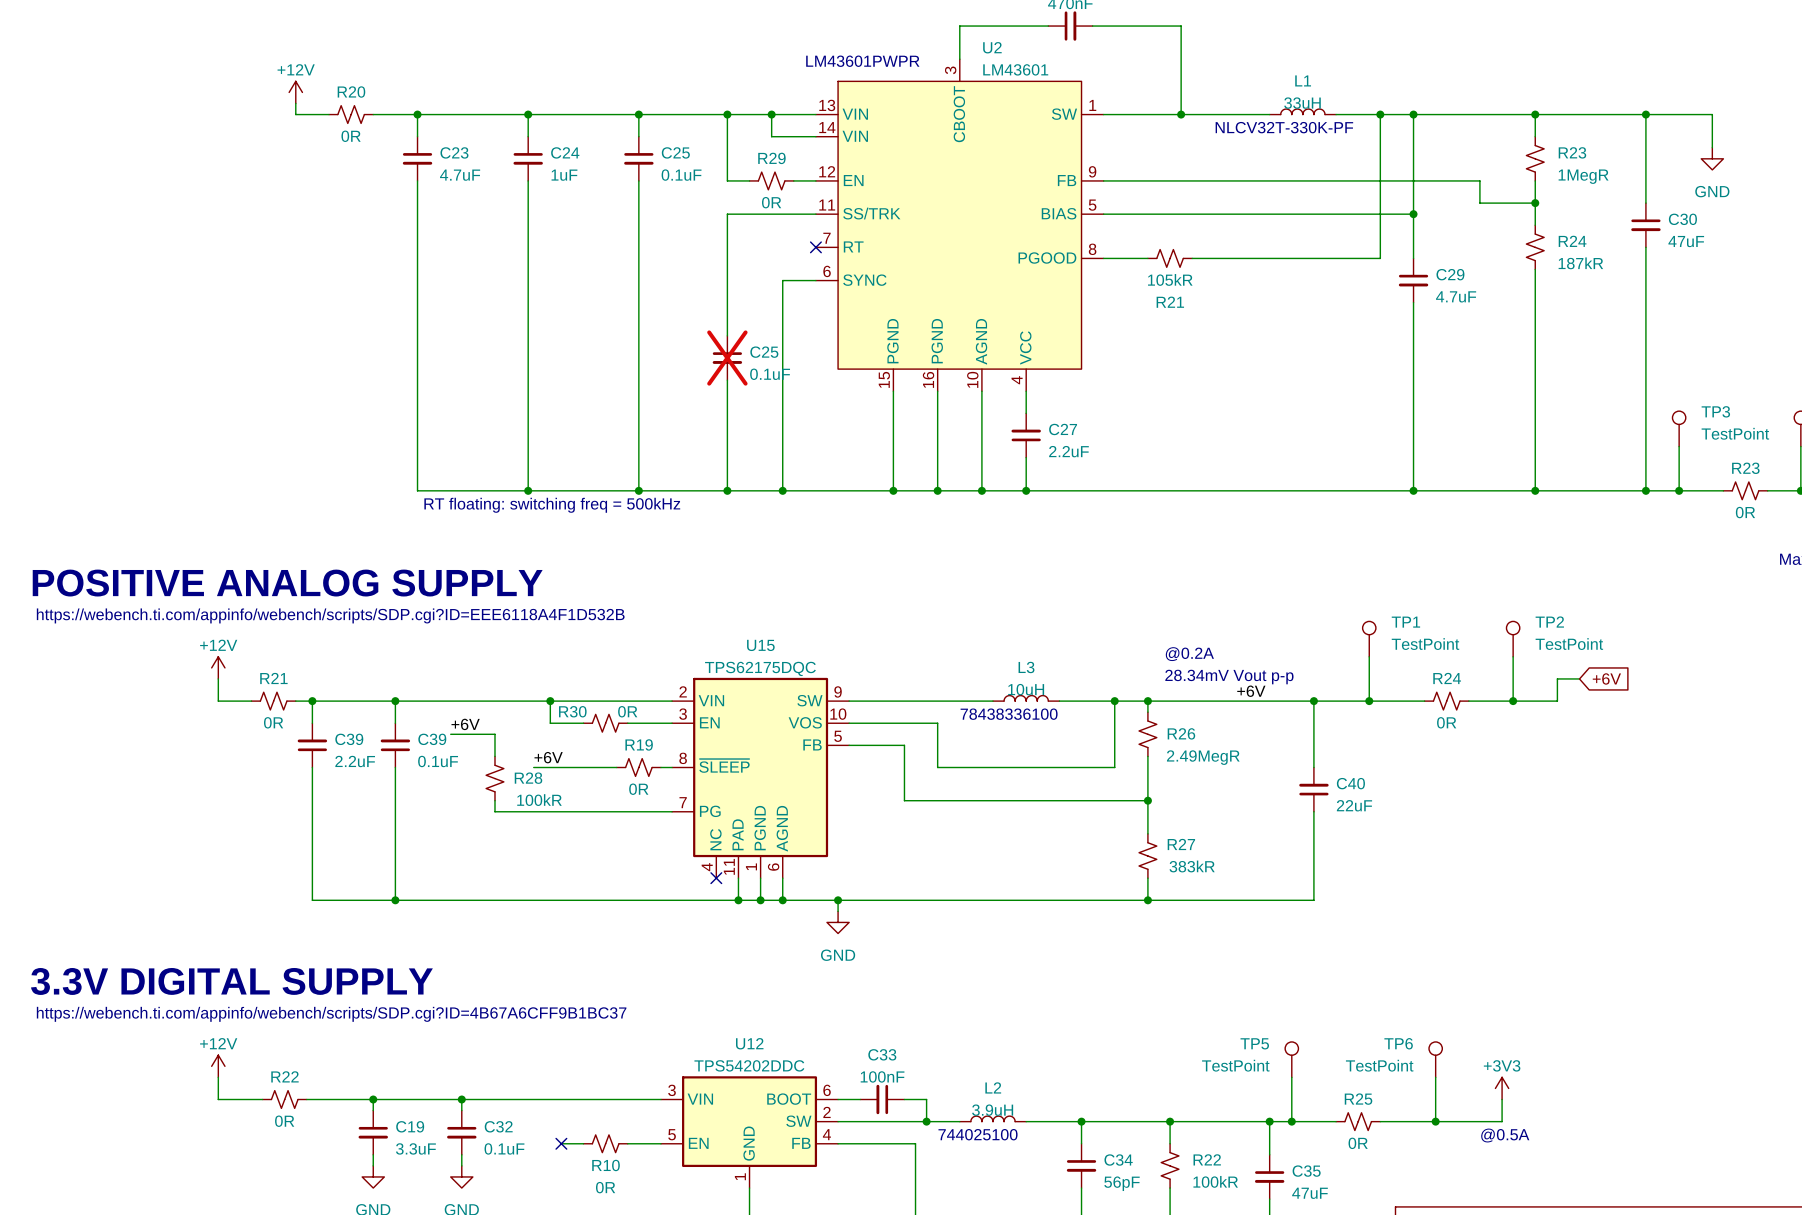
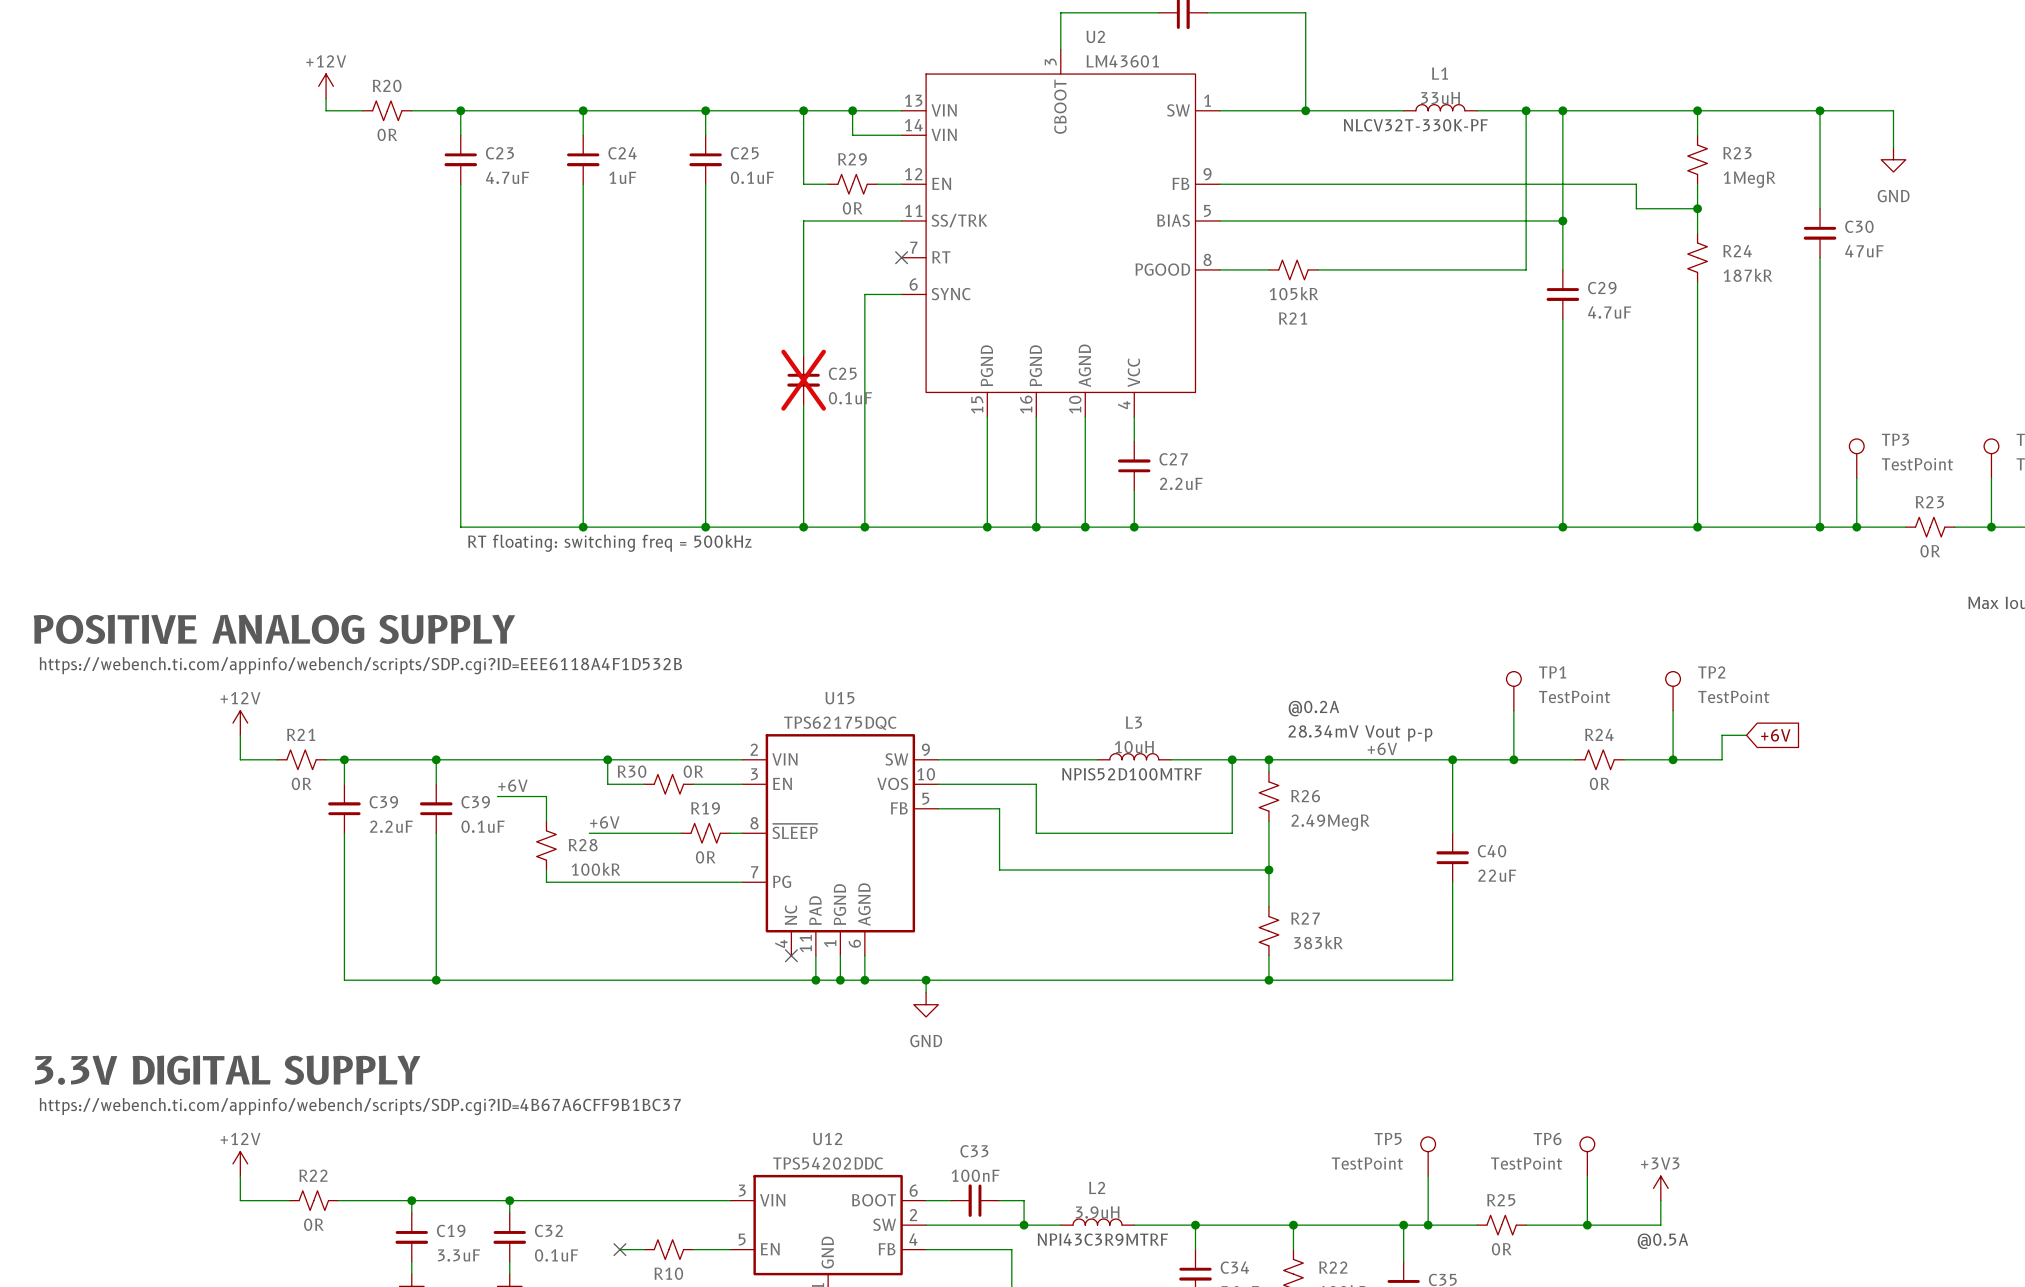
text: LM43601PWPR (862, 61) -> none
text: 78438336100 (1009, 714) -> NPIS52D100MTRF (1132, 774)
text: 744025100 (978, 1134) -> NPI43C3R9MTRF (1102, 1239)

